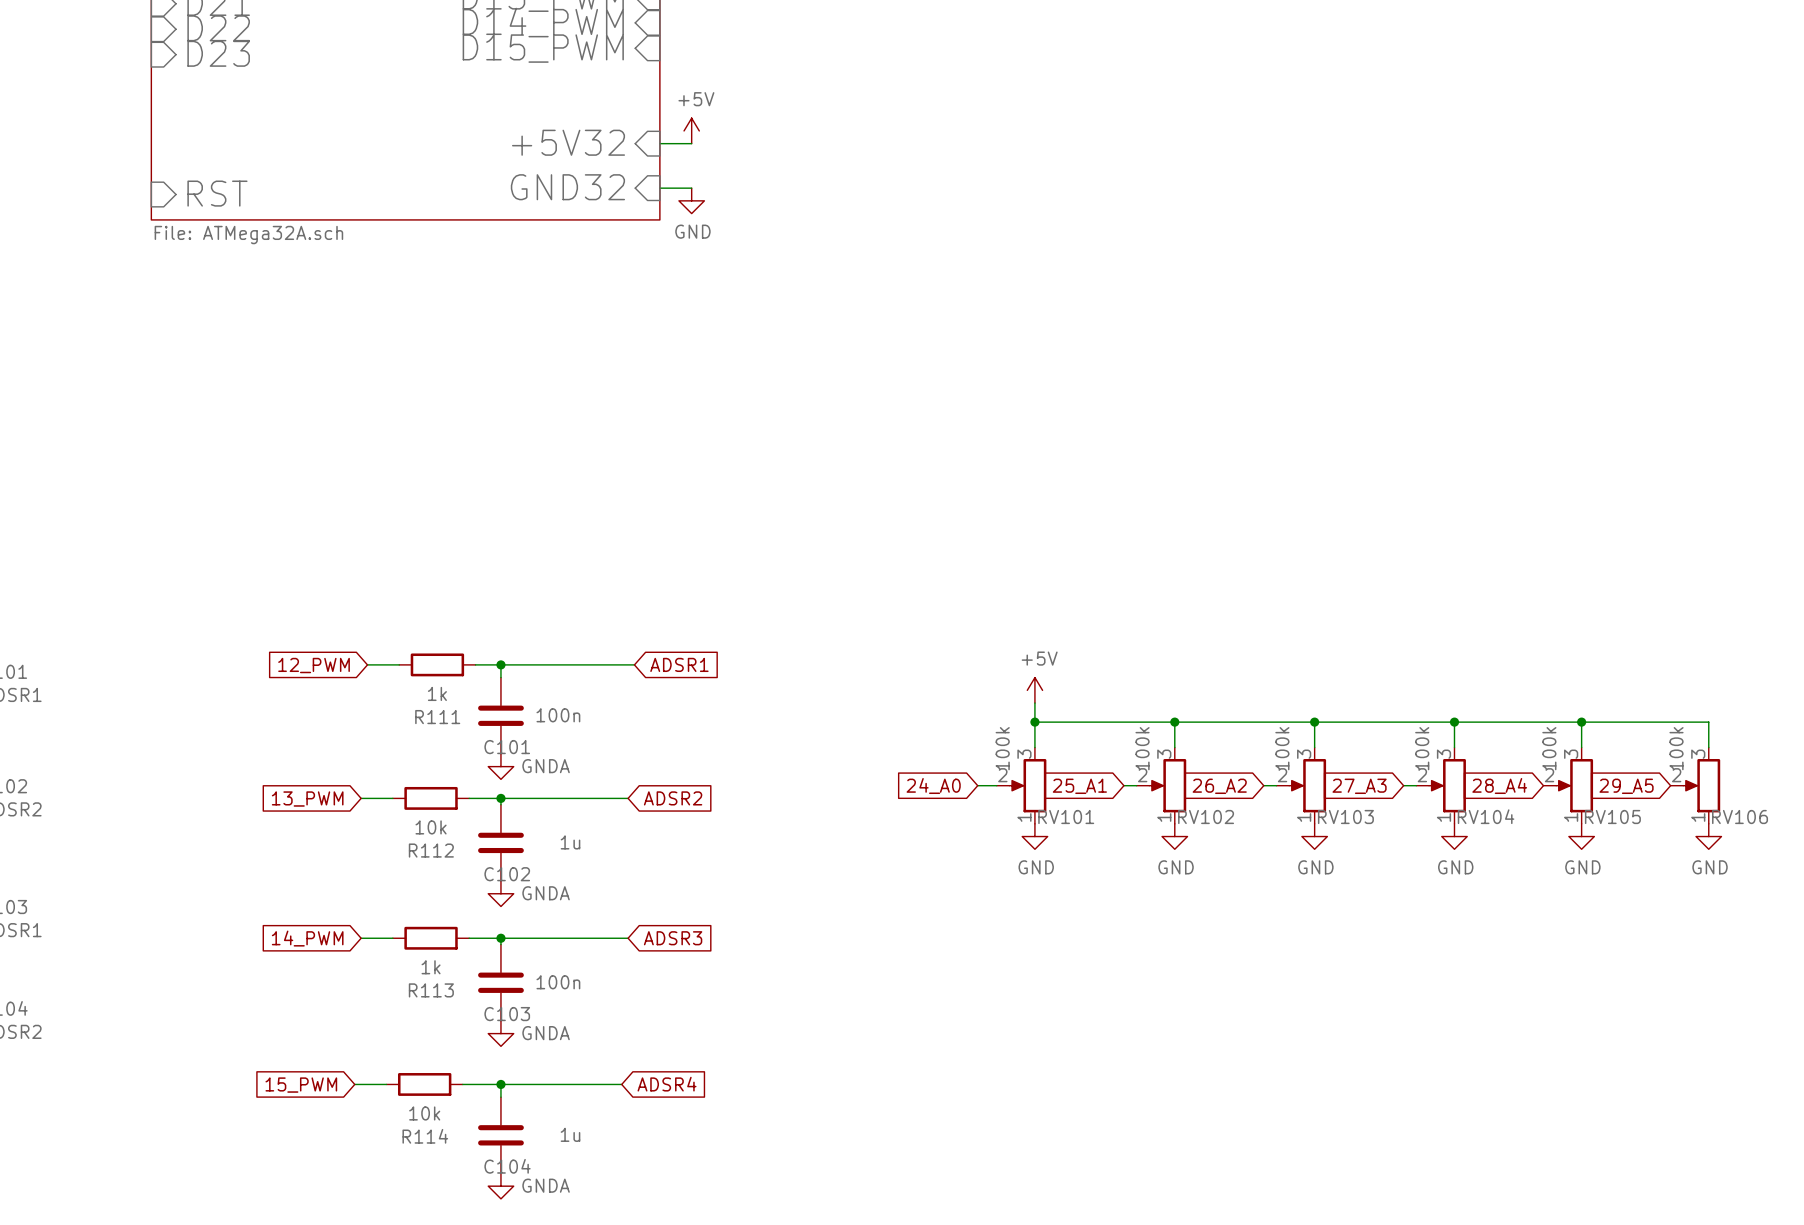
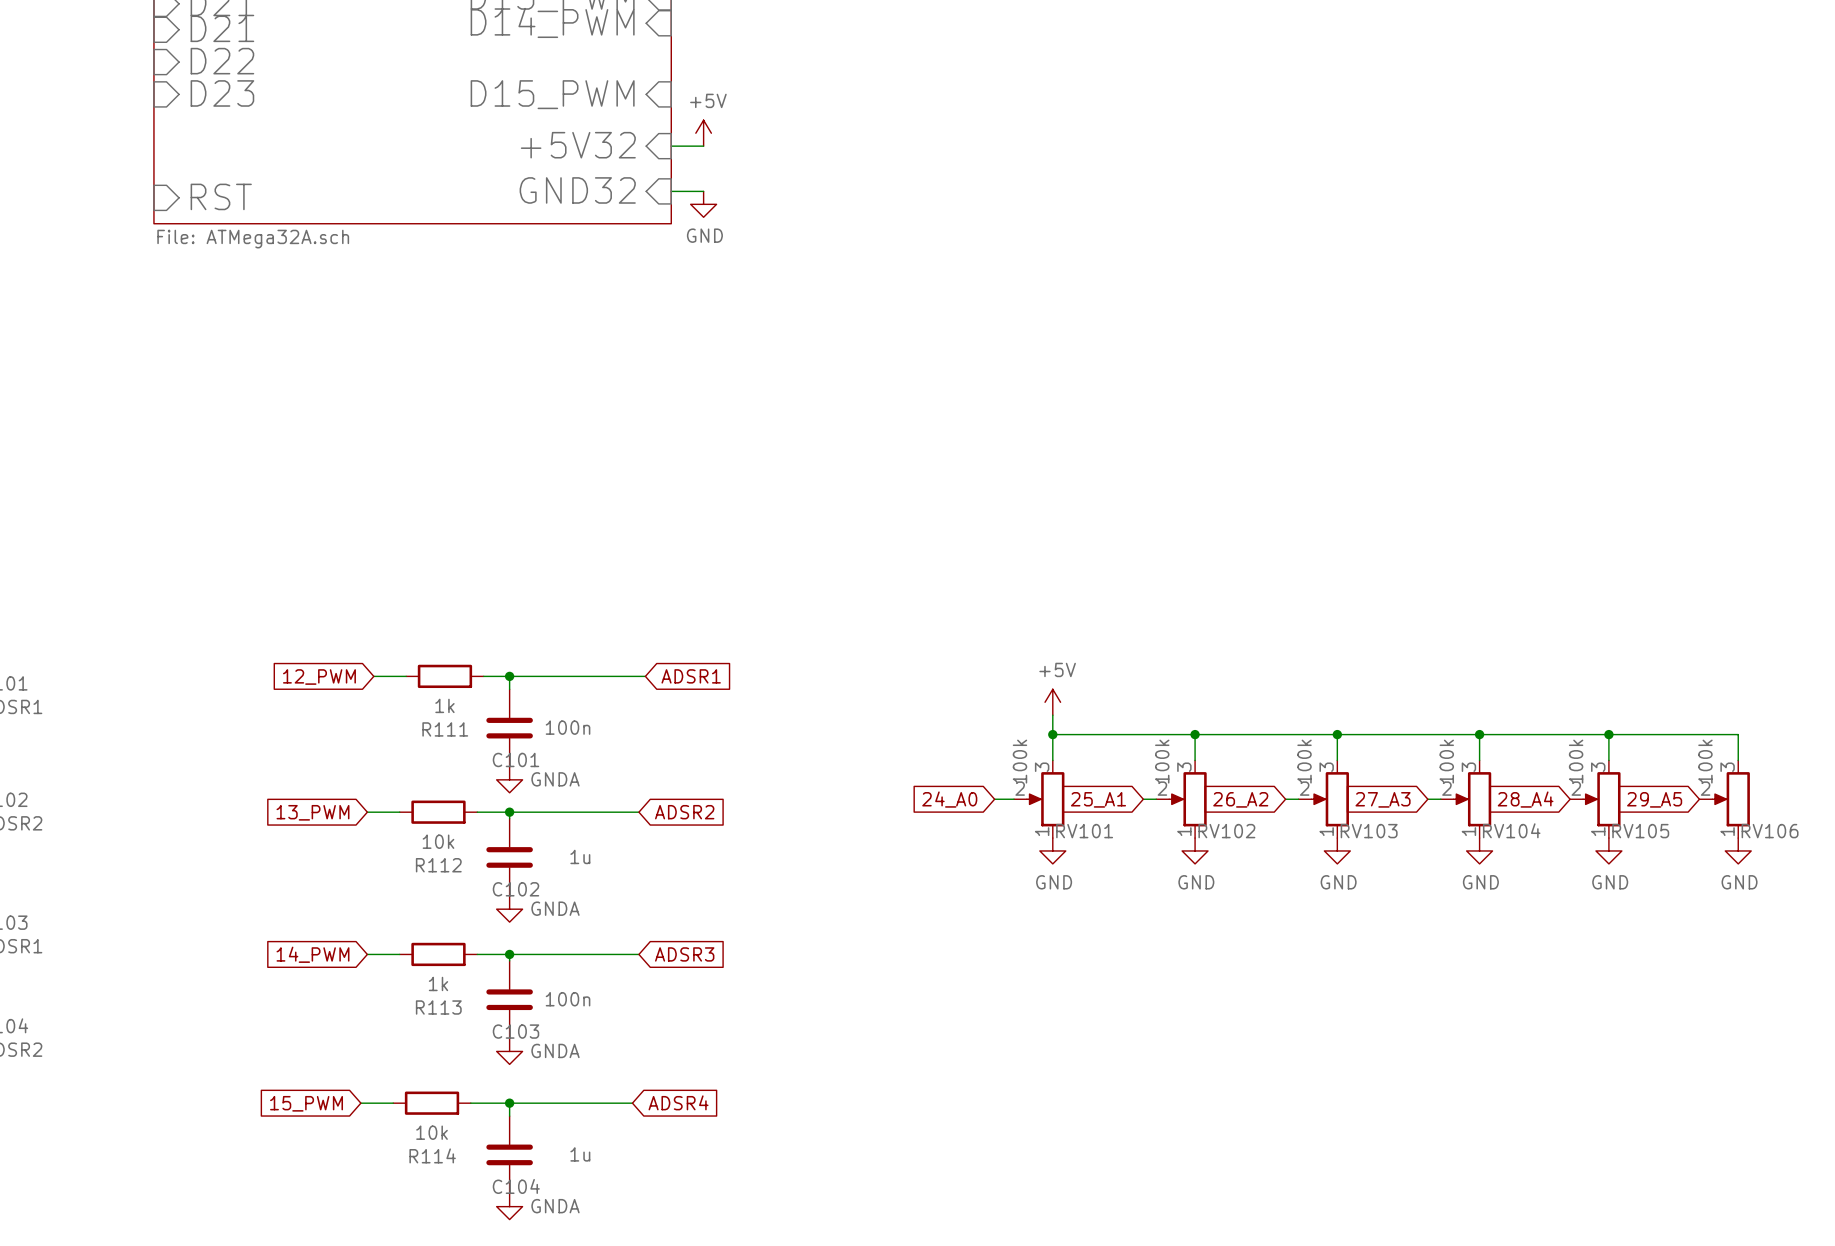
sheet pin: D22 (218, 28) -> D21 (222, 28)
sheet pin position: D15_PWM (543, 48) -> D15_PWM (552, 94)
sheet pin position: D23 (218, 53) -> D23 (222, 93)
sheet pin: none -> D22 (222, 61)

